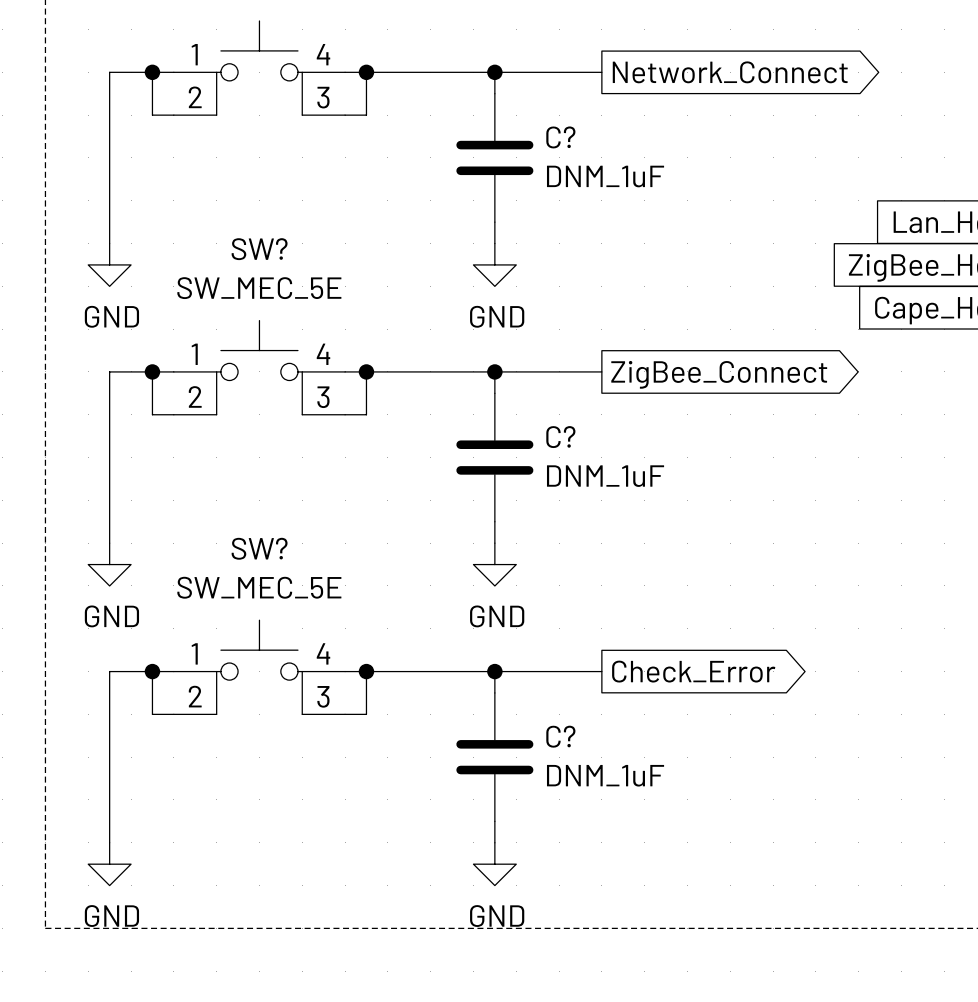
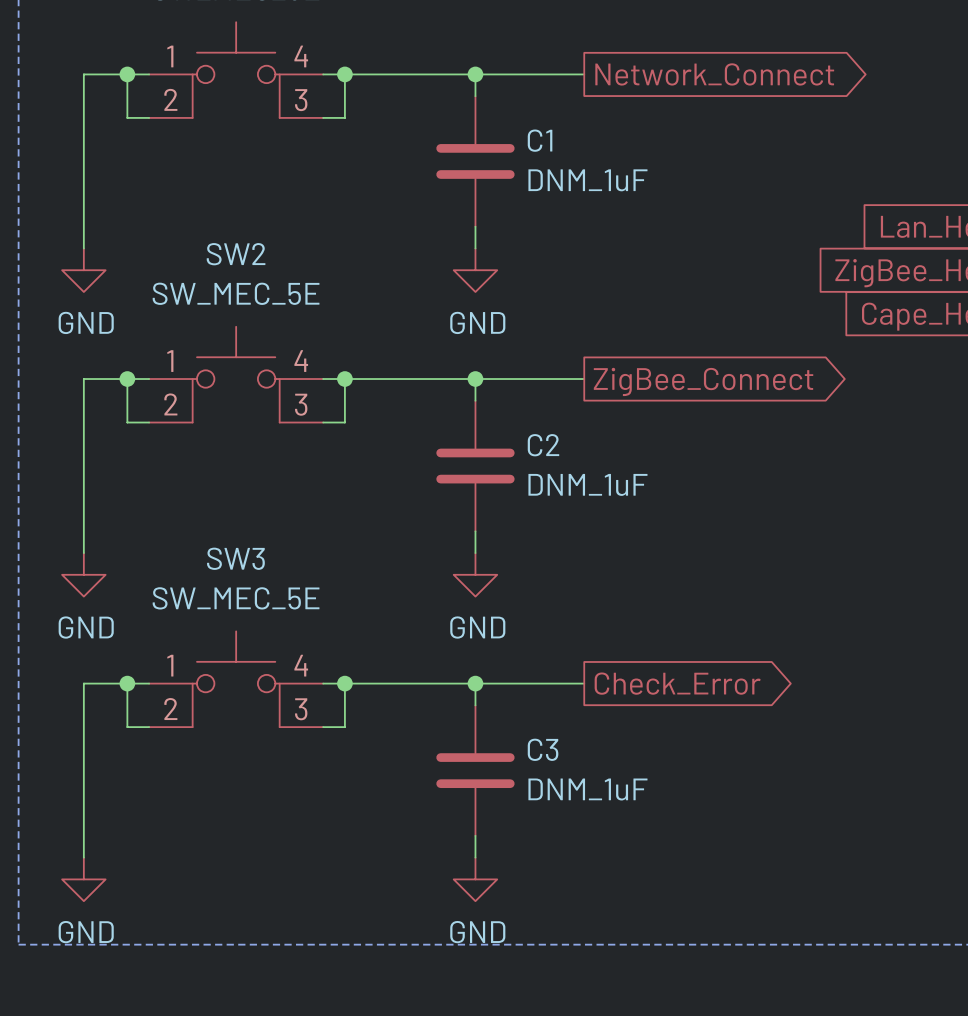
C? name: C? (560, 137) -> C1 (540, 140)
SW? name: SW? (259, 249) -> SW2 (236, 254)
C? name: C? (560, 437) -> C2 (543, 445)
SW? name: SW? (259, 548) -> SW3 (235, 558)
C? name: C? (560, 736) -> C3 (543, 749)

